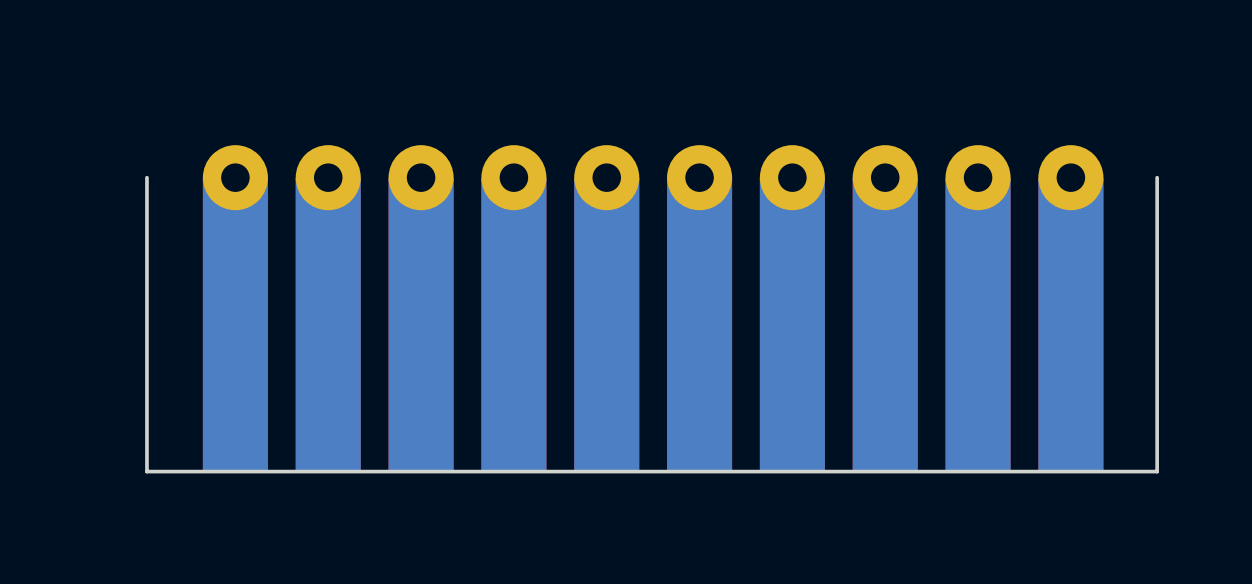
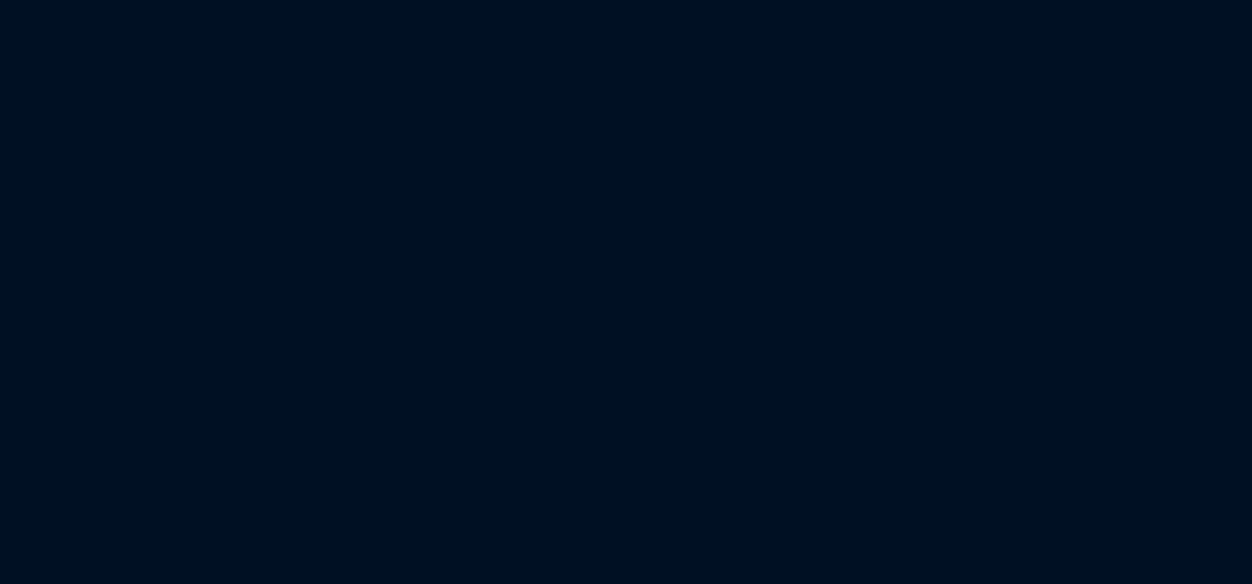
board edge: (1157, 177) (1157, 471) (146, 471) (146, 177) -> none
part: (653, 307) -> none

